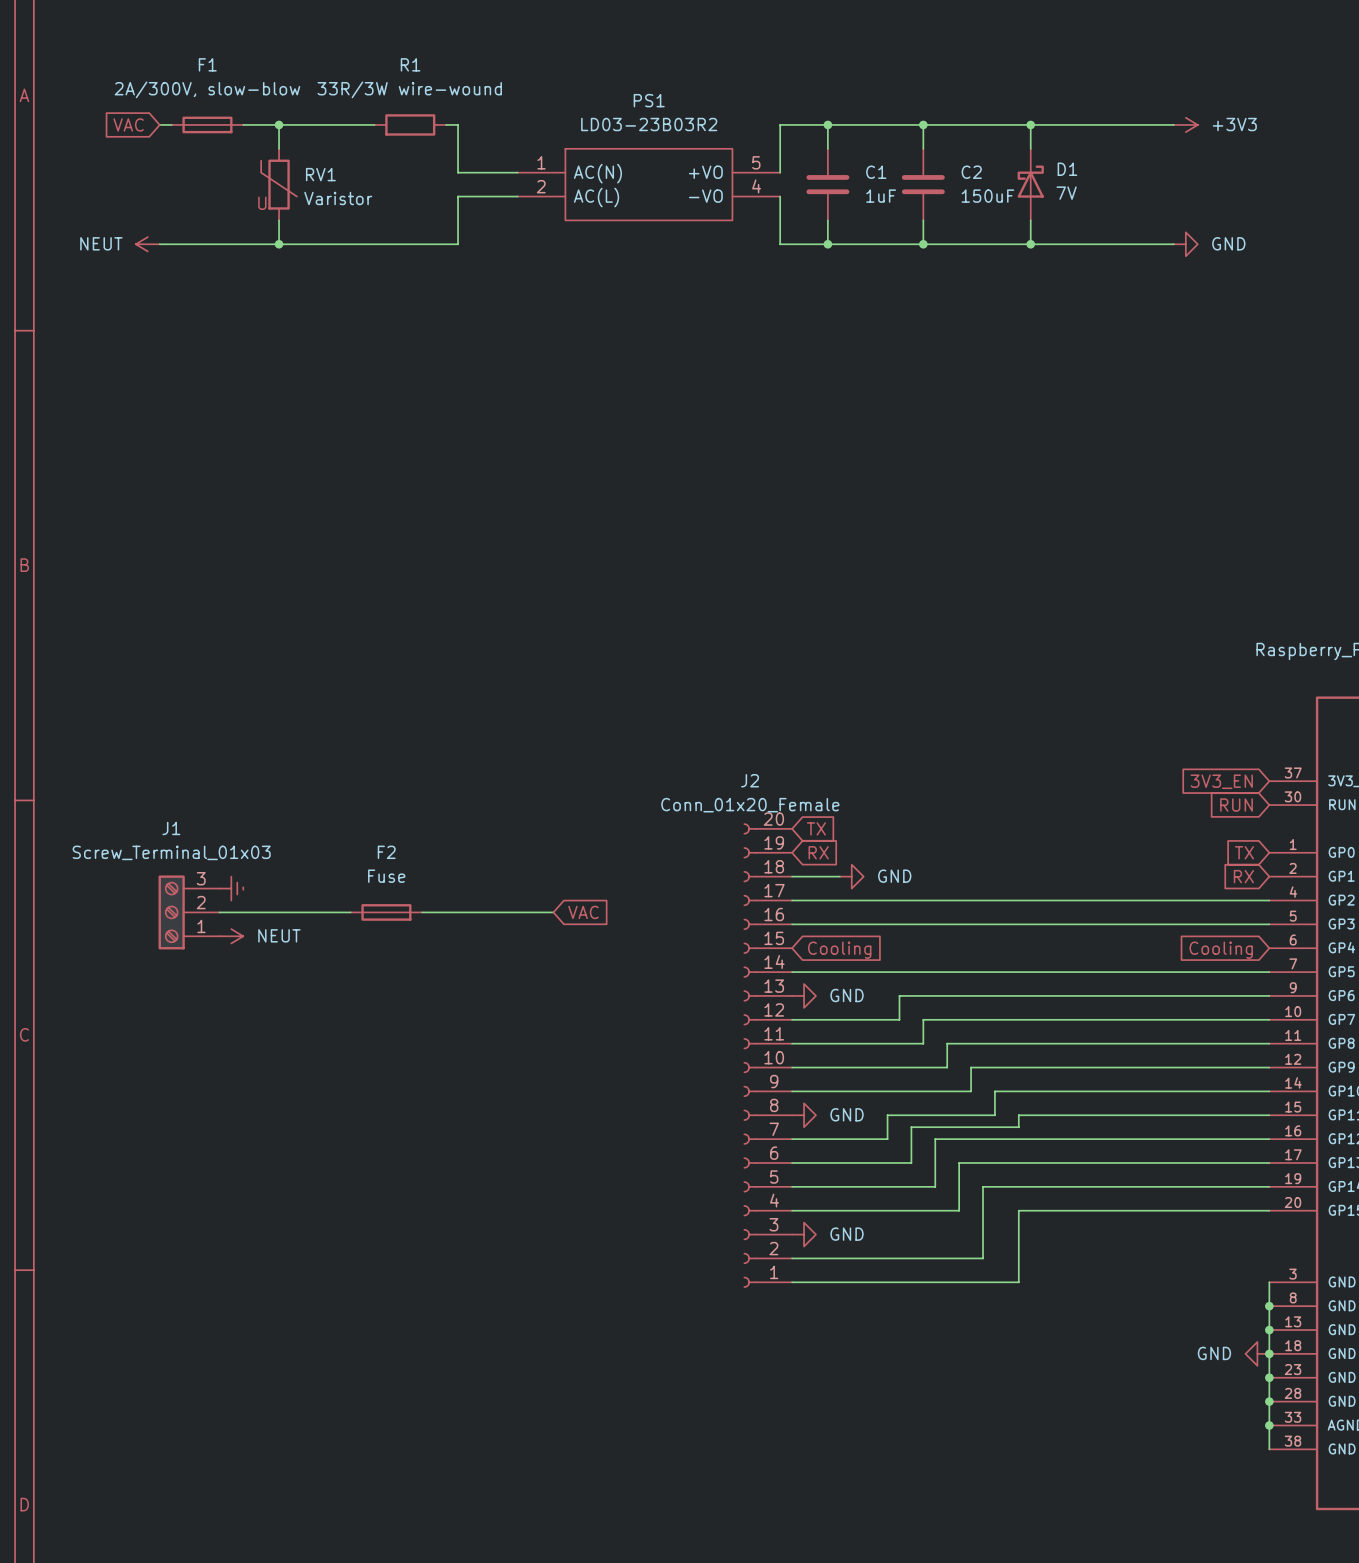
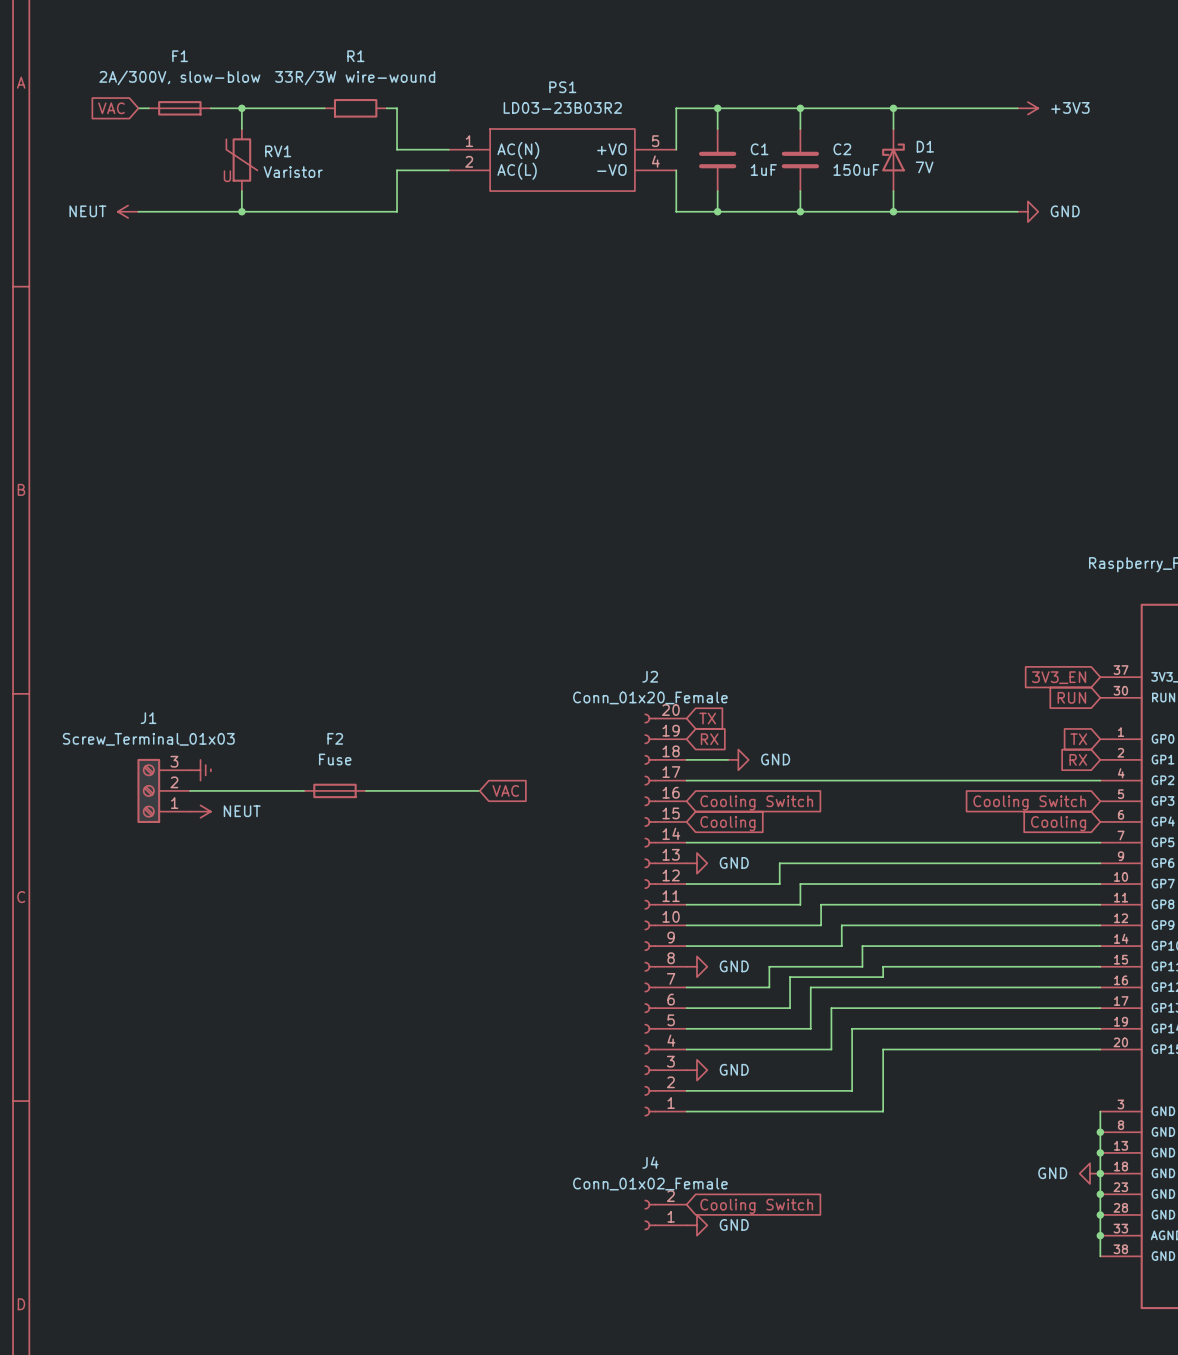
wire: (792, 924) (1269, 924) -> none
global label: none -> Cooling Switch (756, 803)
global label: none -> Cooling Switch (1029, 803)
global label: none -> Cooling Switch (756, 1206)
J4: none -> Conn_01x02_Female (665, 1214)
power symbol: none -> GND (696, 1225)

